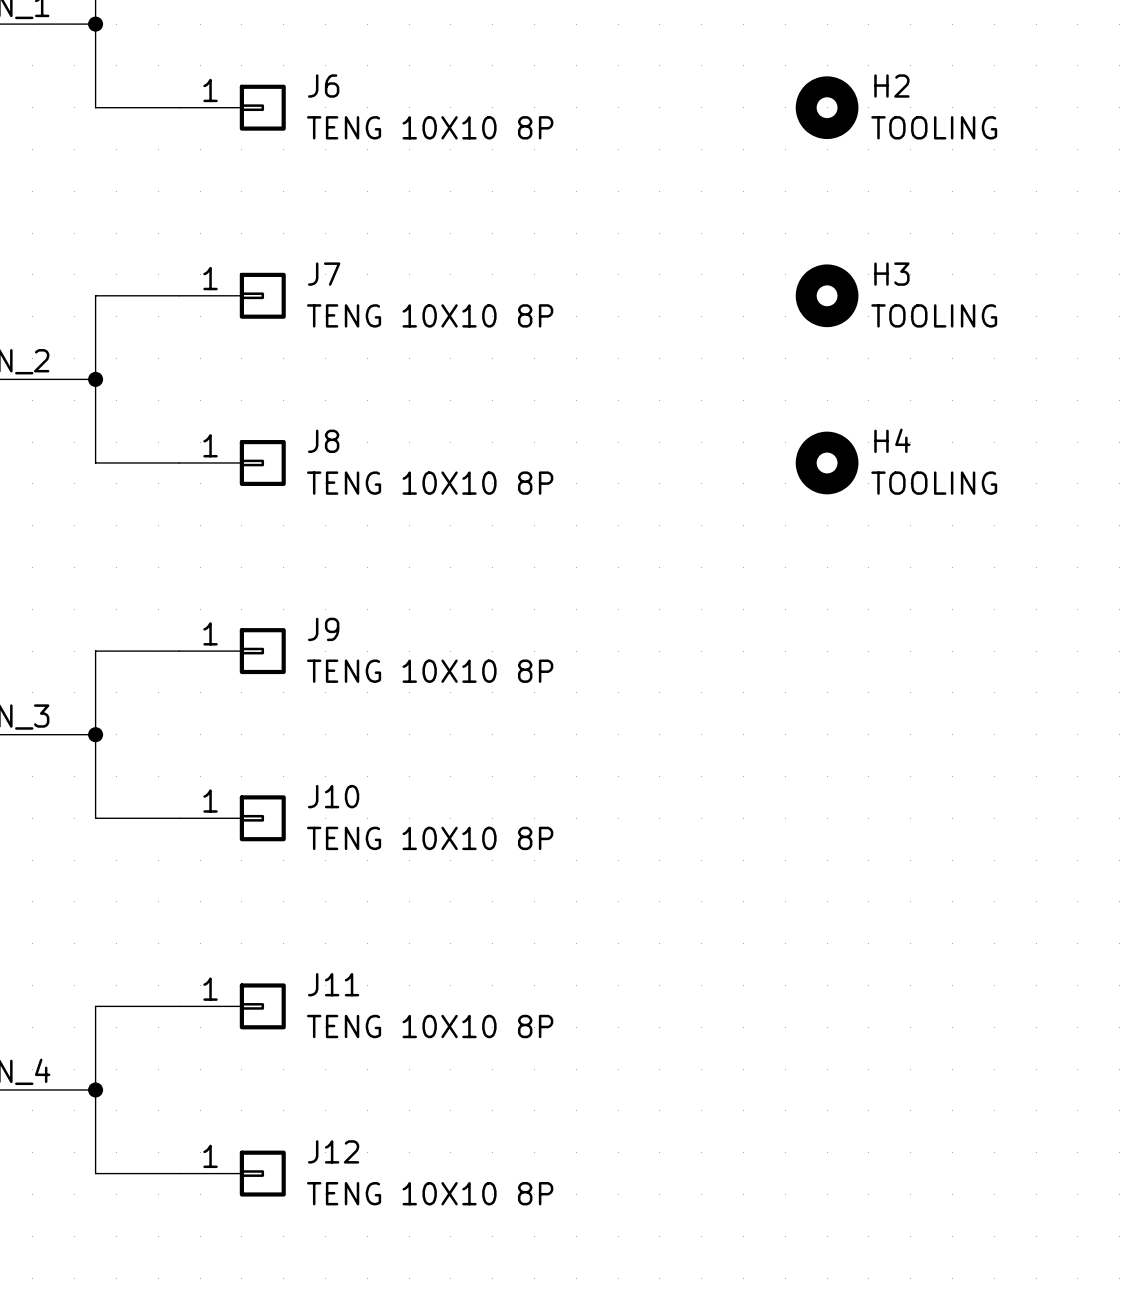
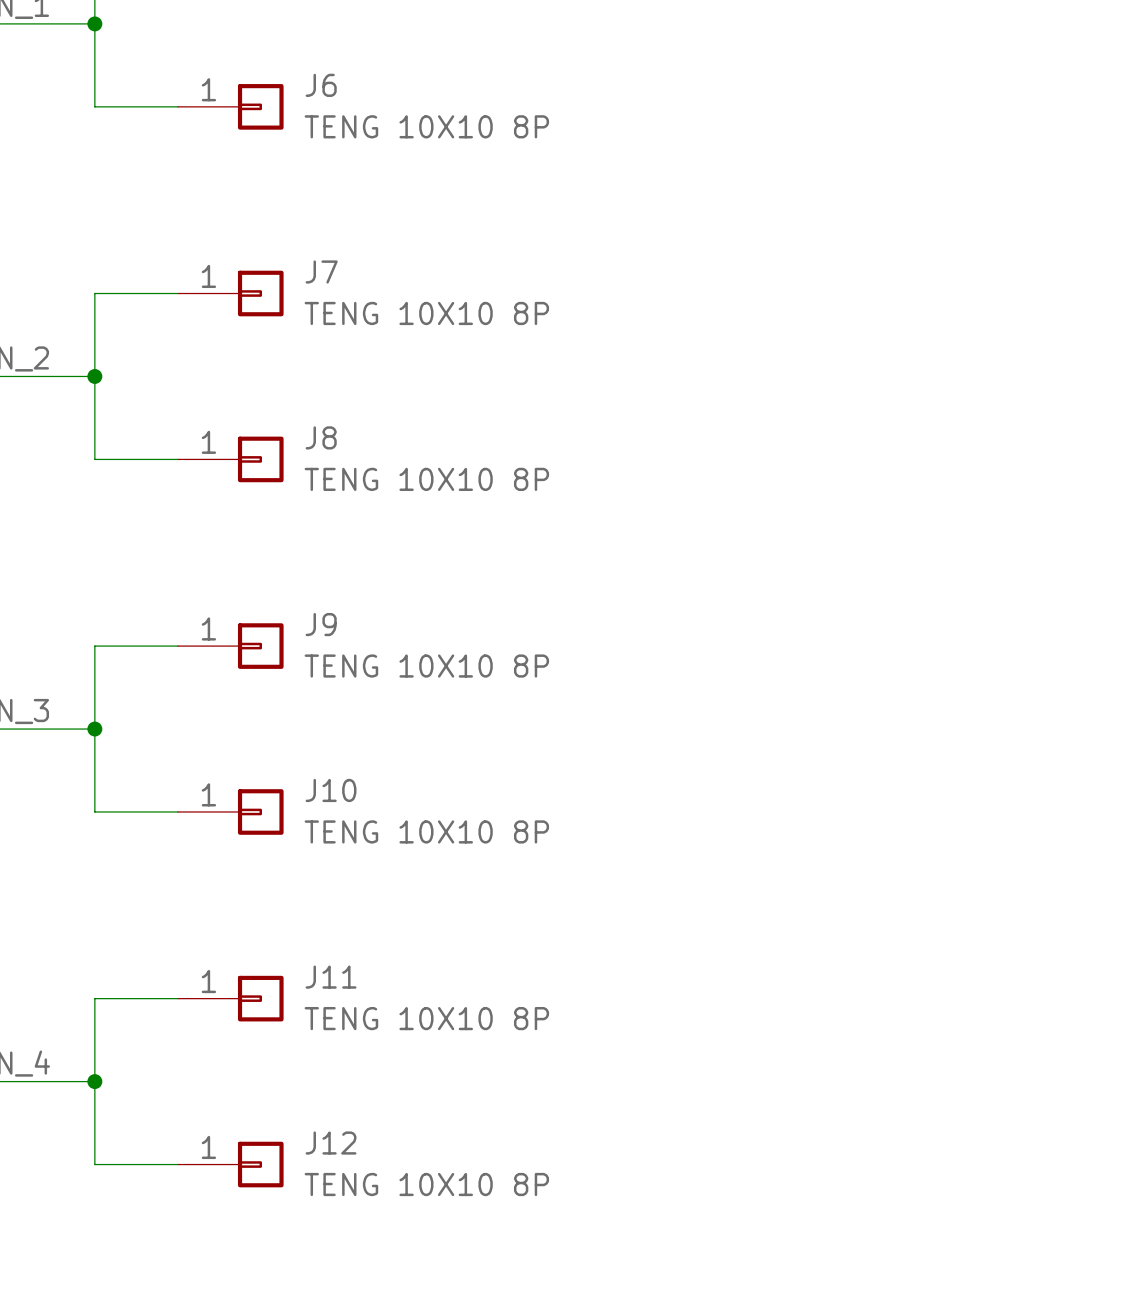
H2: TOOLING (827, 107) -> none
H3: TOOLING (827, 295) -> none
H4: TOOLING (827, 462) -> none

